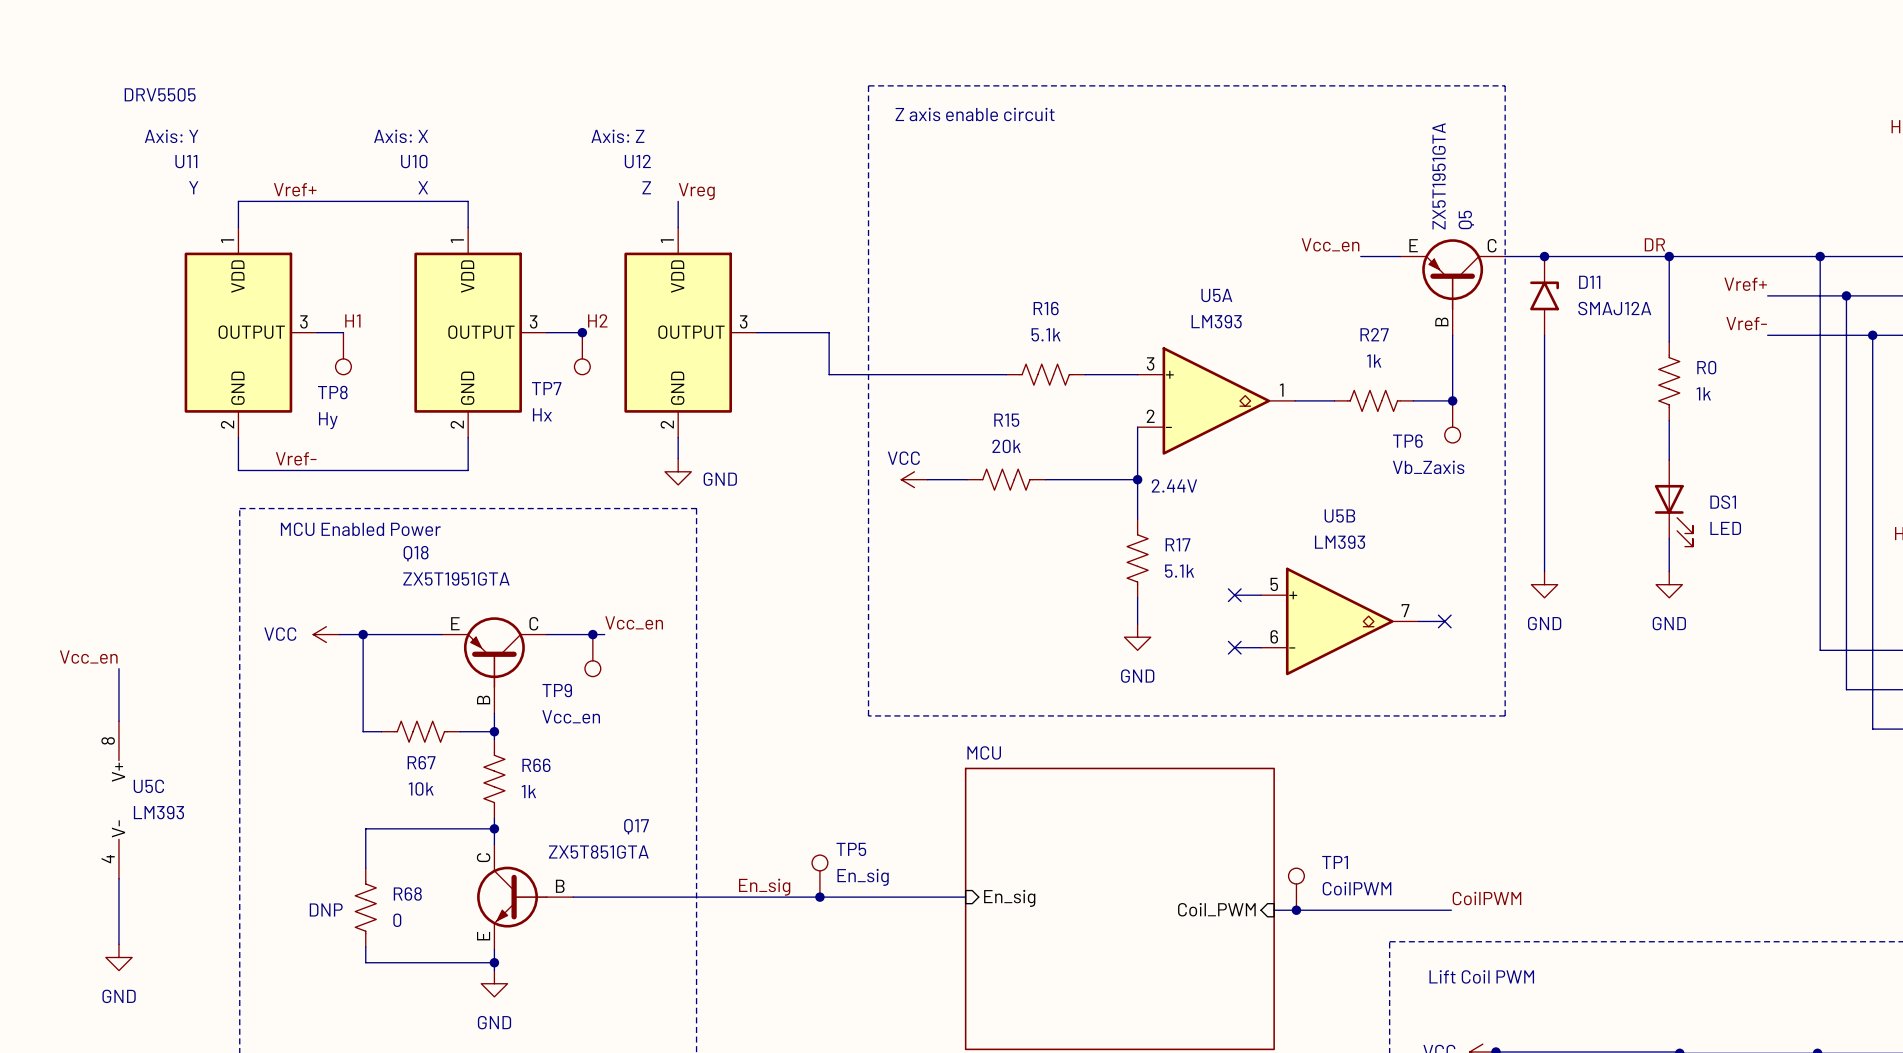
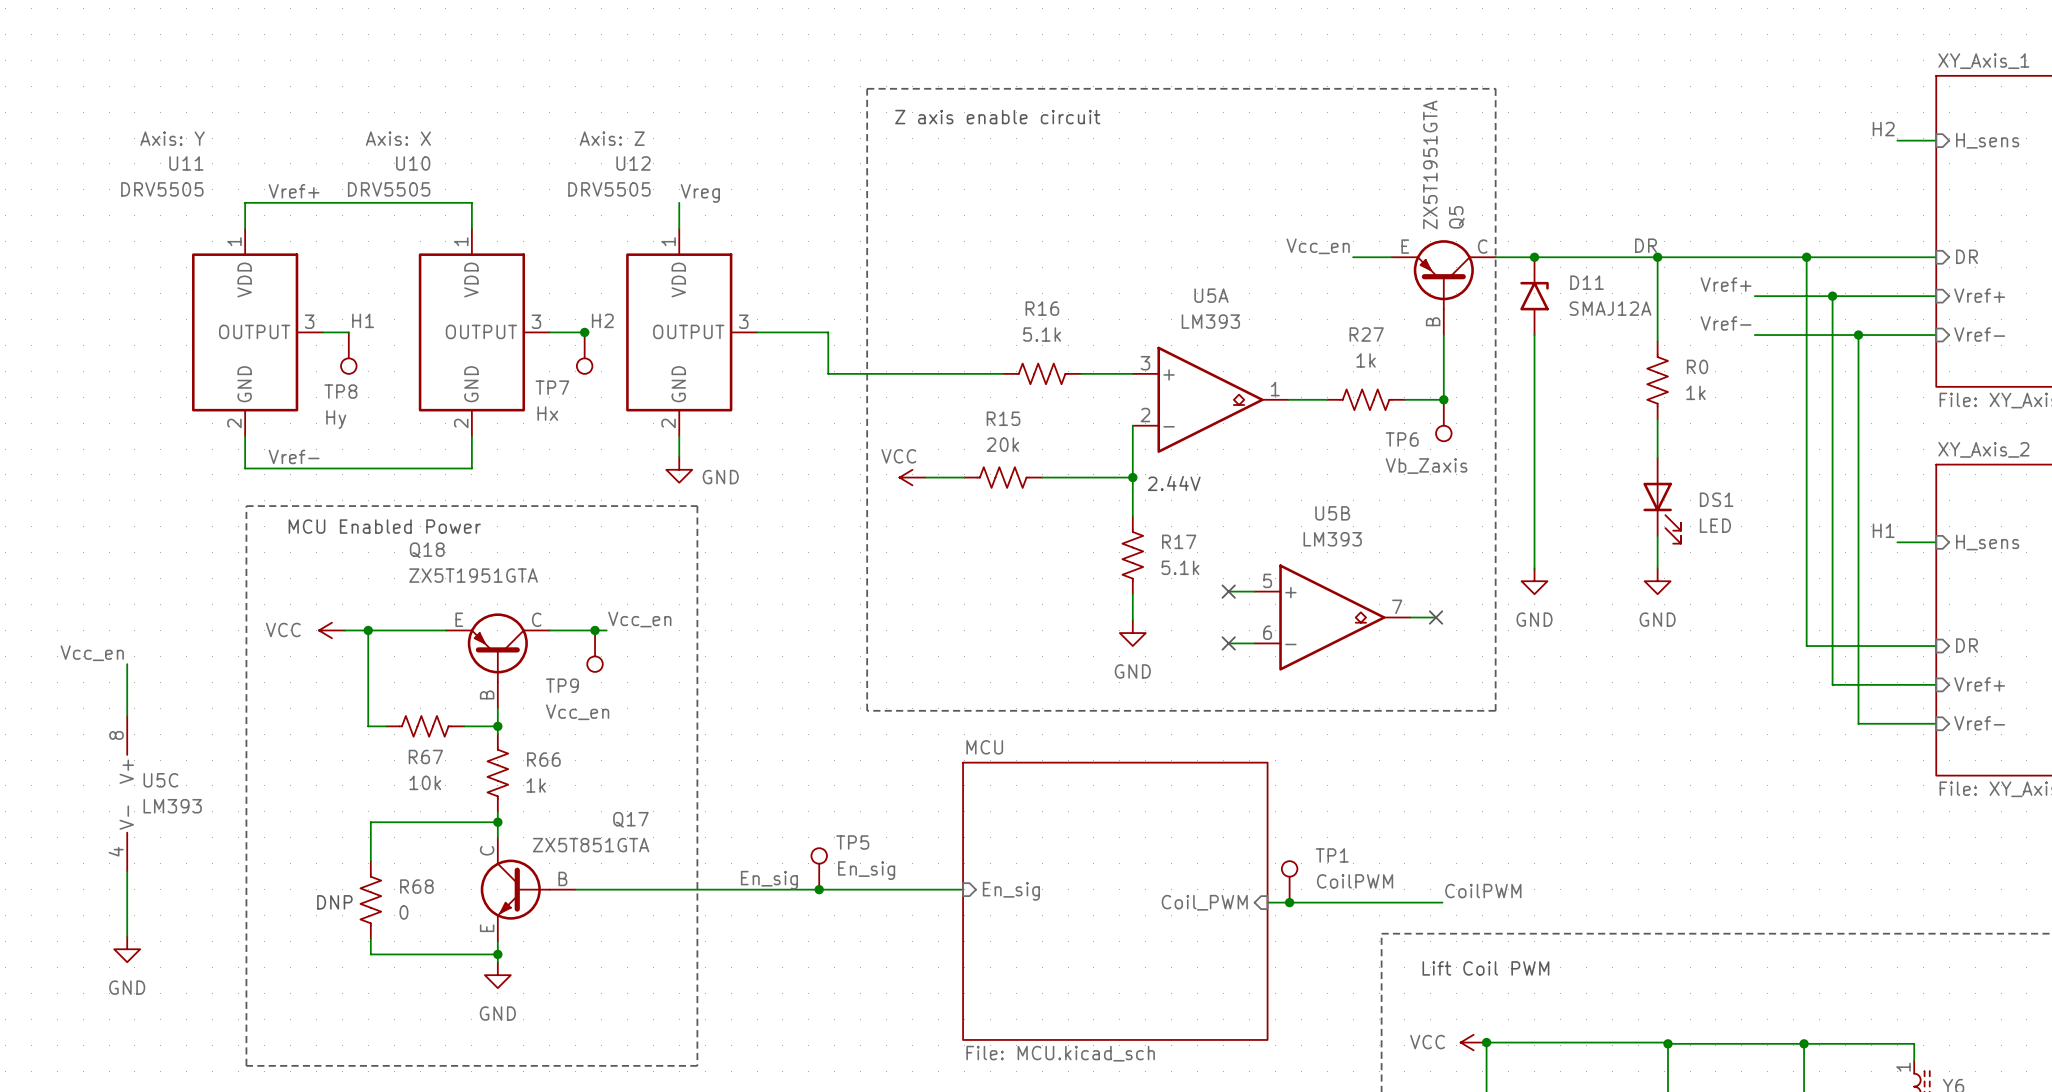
text: DRV5505 (160, 94) -> none
U11 value: Y (193, 187) -> DRV5505 (162, 189)
U10 value: X (423, 187) -> DRV5505 (389, 189)
U12 value: Z (646, 187) -> DRV5505 (609, 189)

